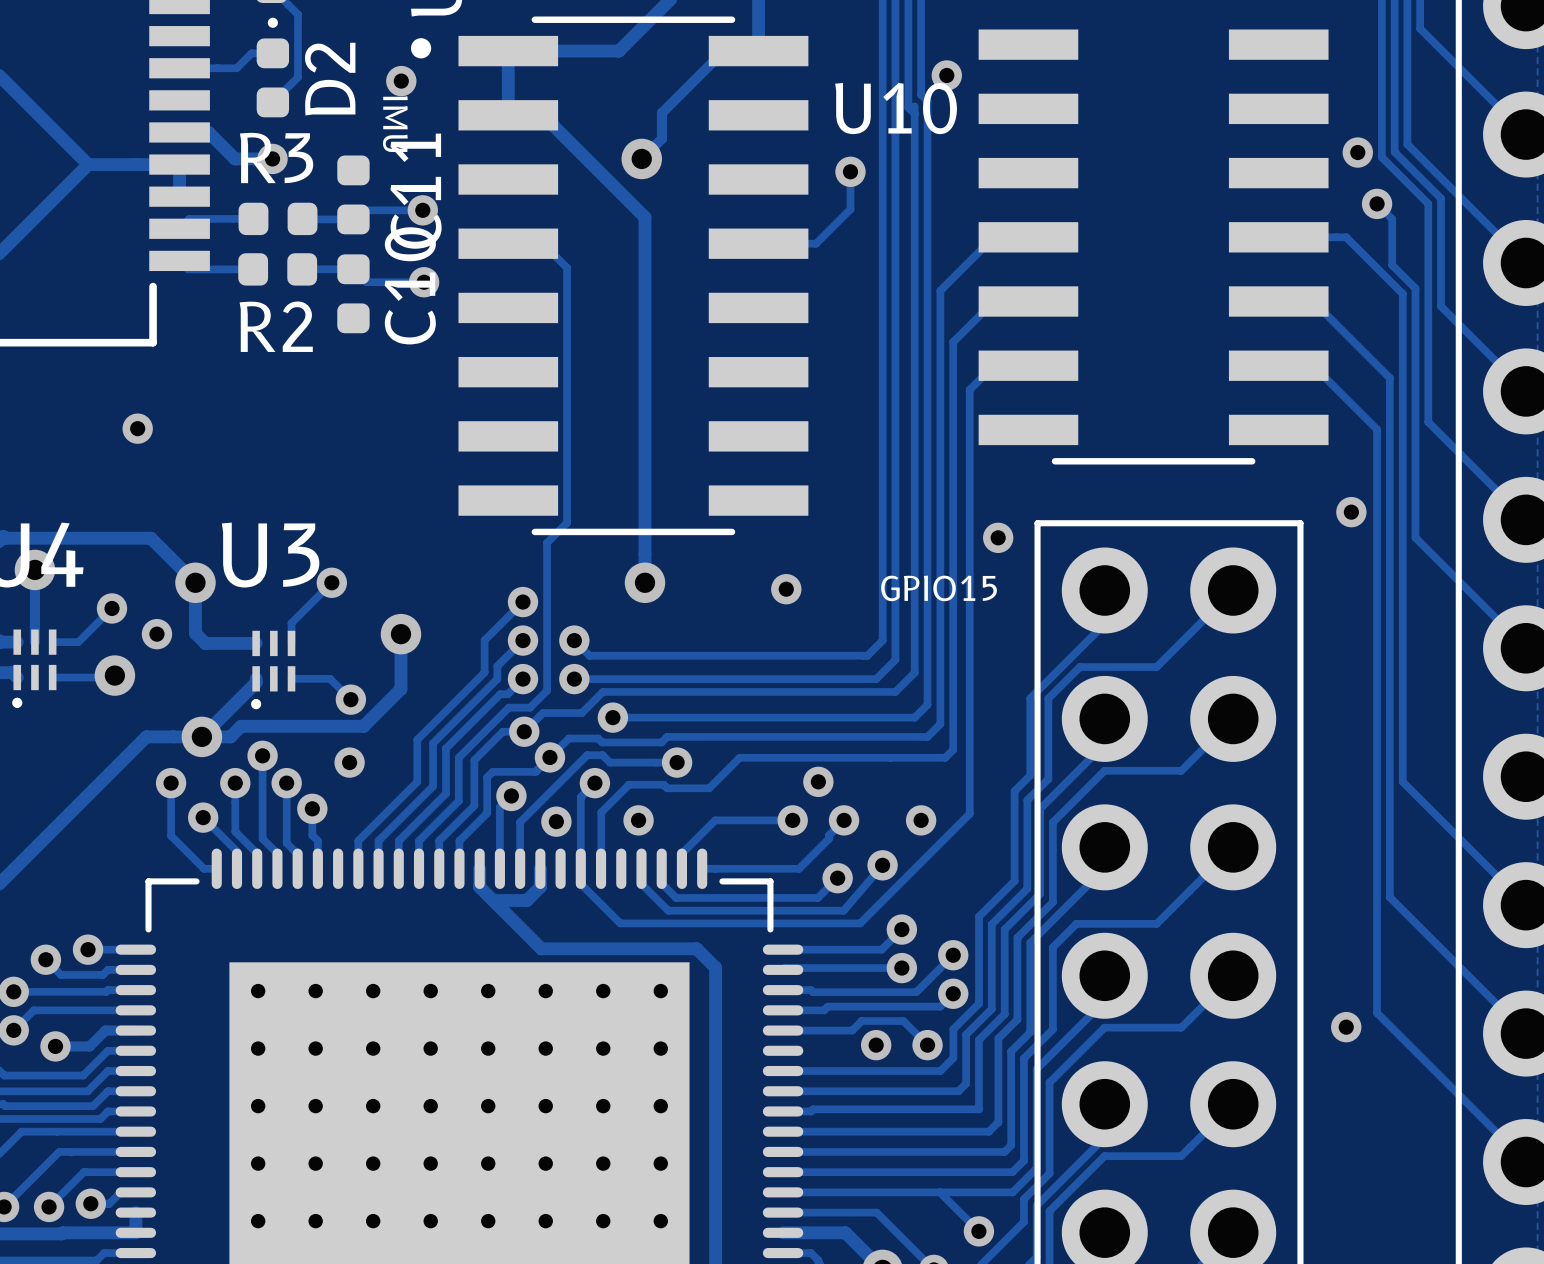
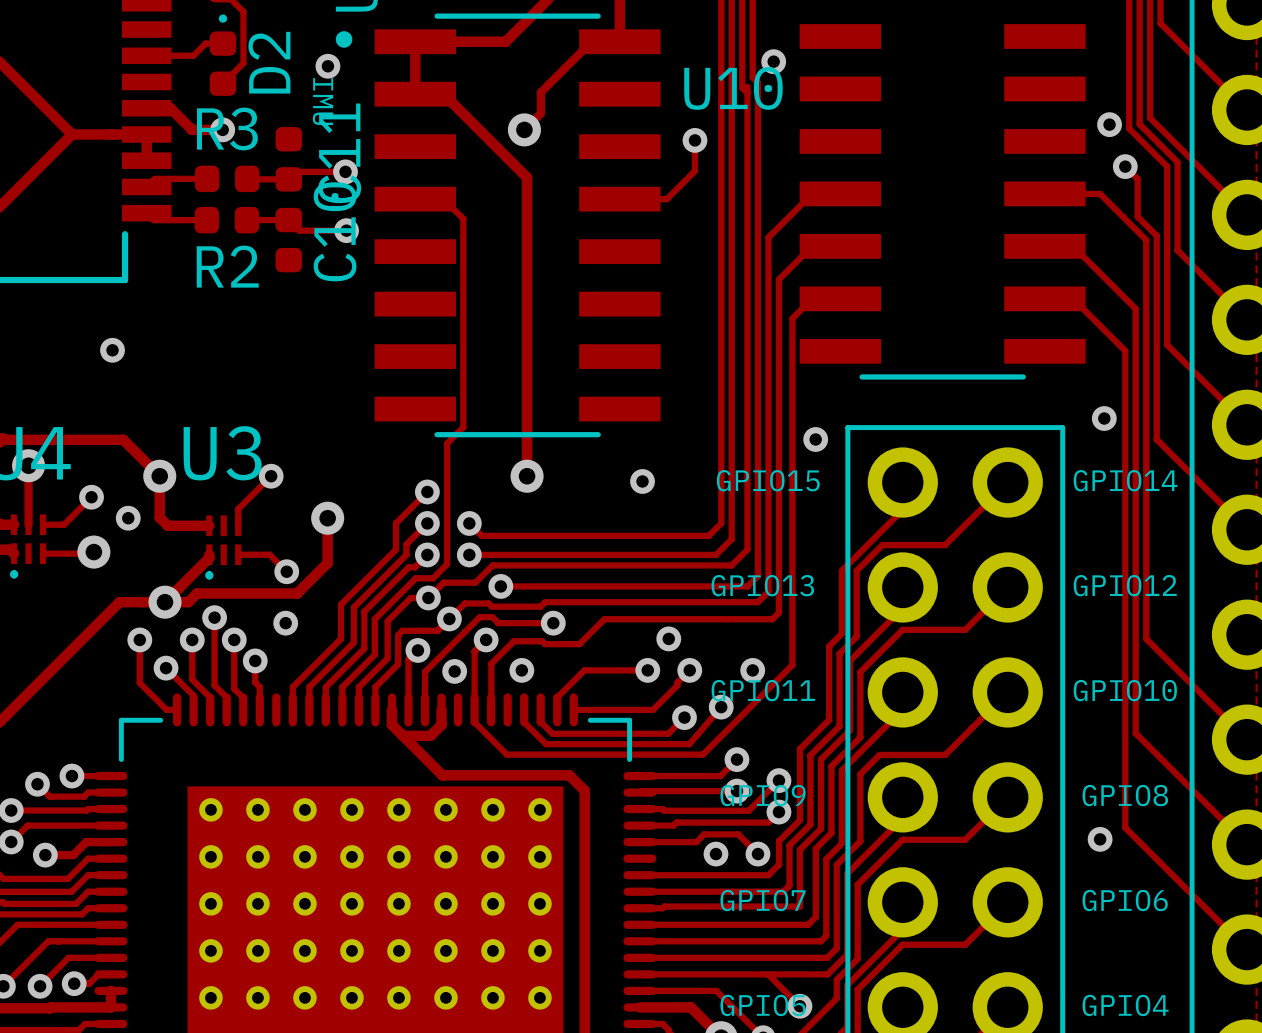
text: none -> GPIO14 (1125, 480)
text: none -> GPIO13 (762, 585)
text: none -> GPIO12 (1125, 585)
text: none -> GPIO11 (763, 690)
text: none -> GPIO10 (1125, 690)
text: none -> GPIO9 (763, 795)
text: none -> GPIO8 (1125, 795)
text: none -> GPIO7 (763, 900)
text: none -> GPIO6 (1125, 900)
text: none -> GPIO5 (763, 1005)
text: none -> GPIO4 (1125, 1005)

